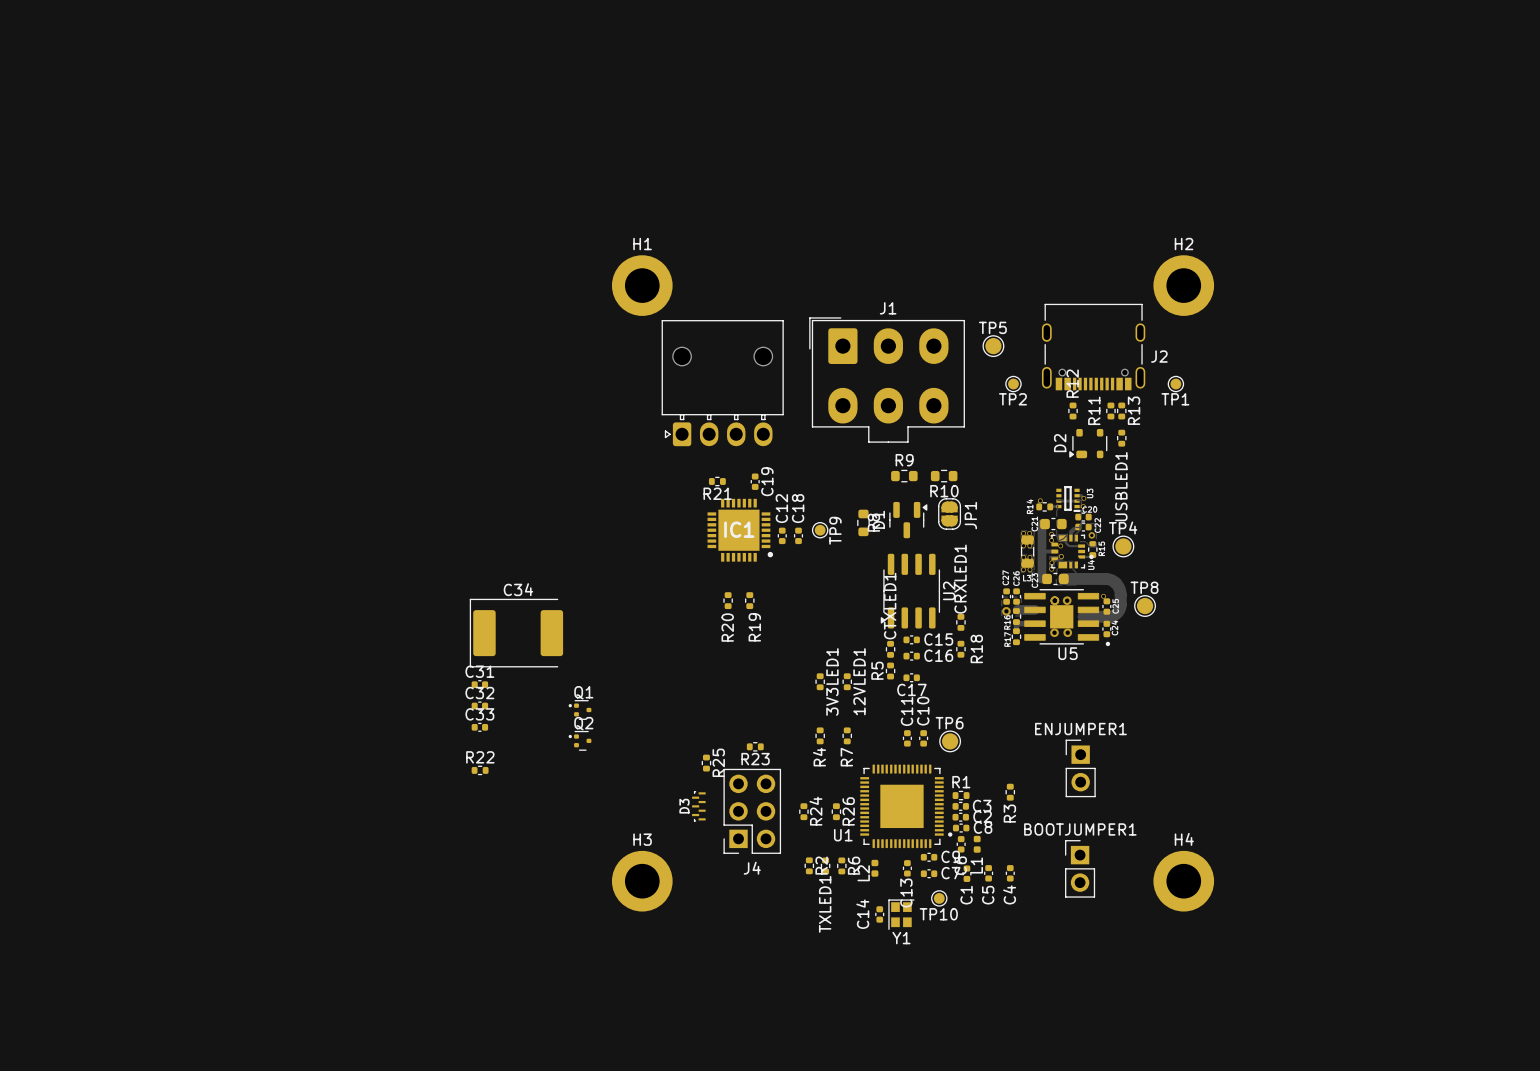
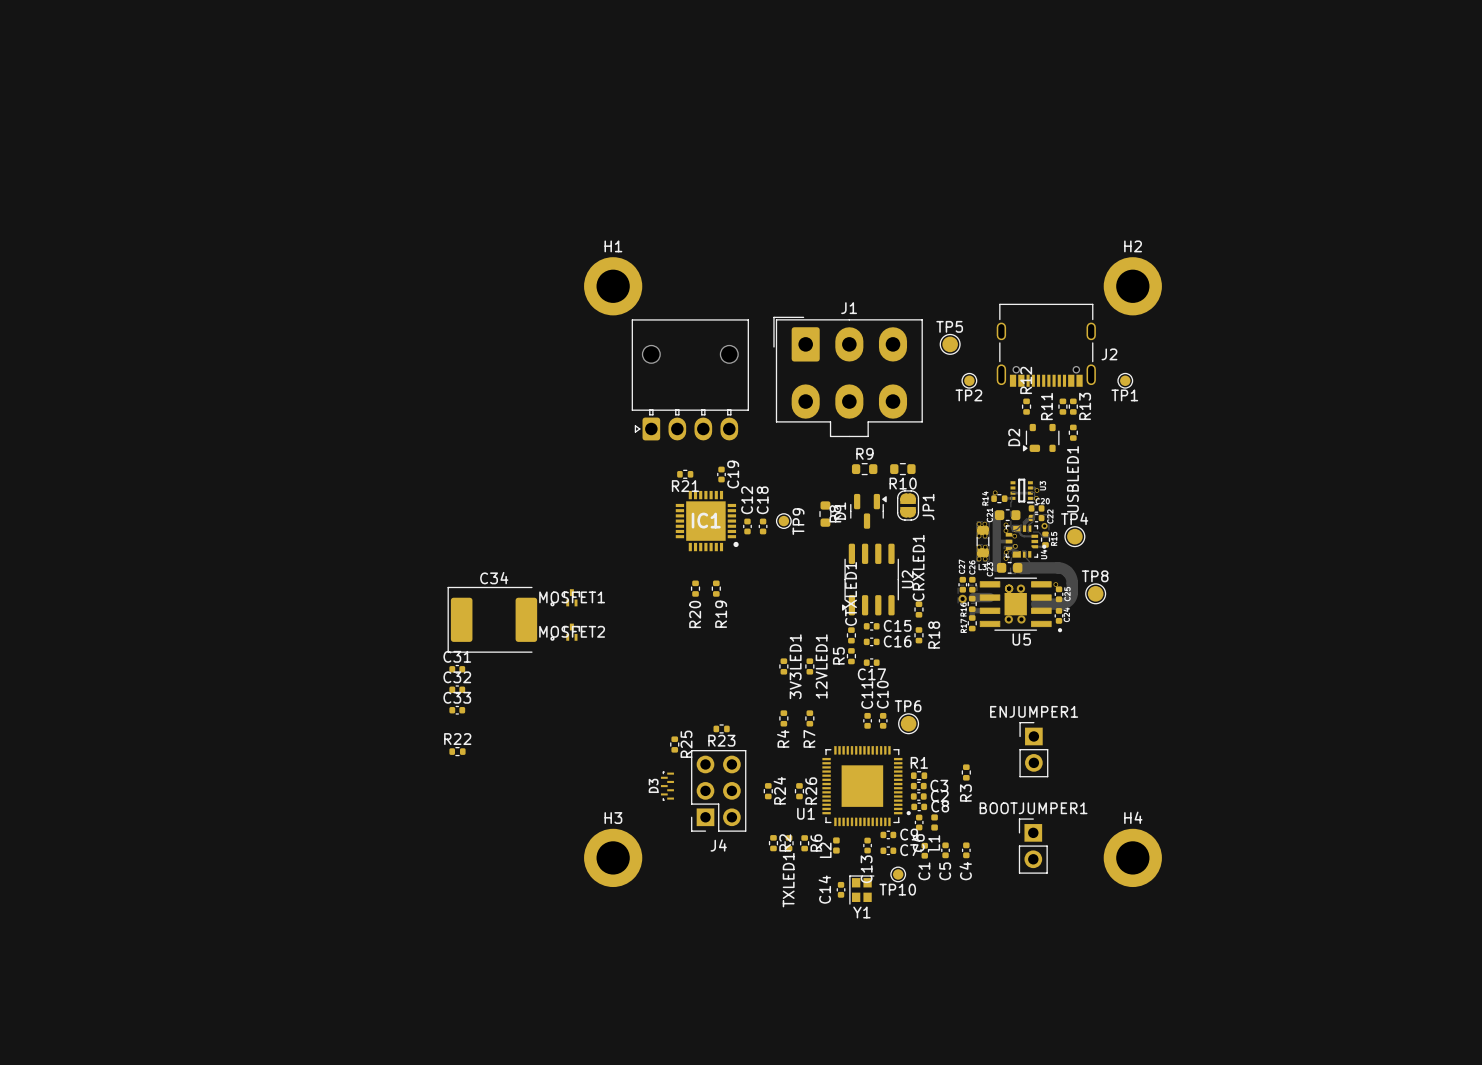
MOSFET1: none -> (565, 597)
MOSFET2: none -> (565, 632)
Q1: (580, 709) -> none
Q2: (580, 740) -> none

